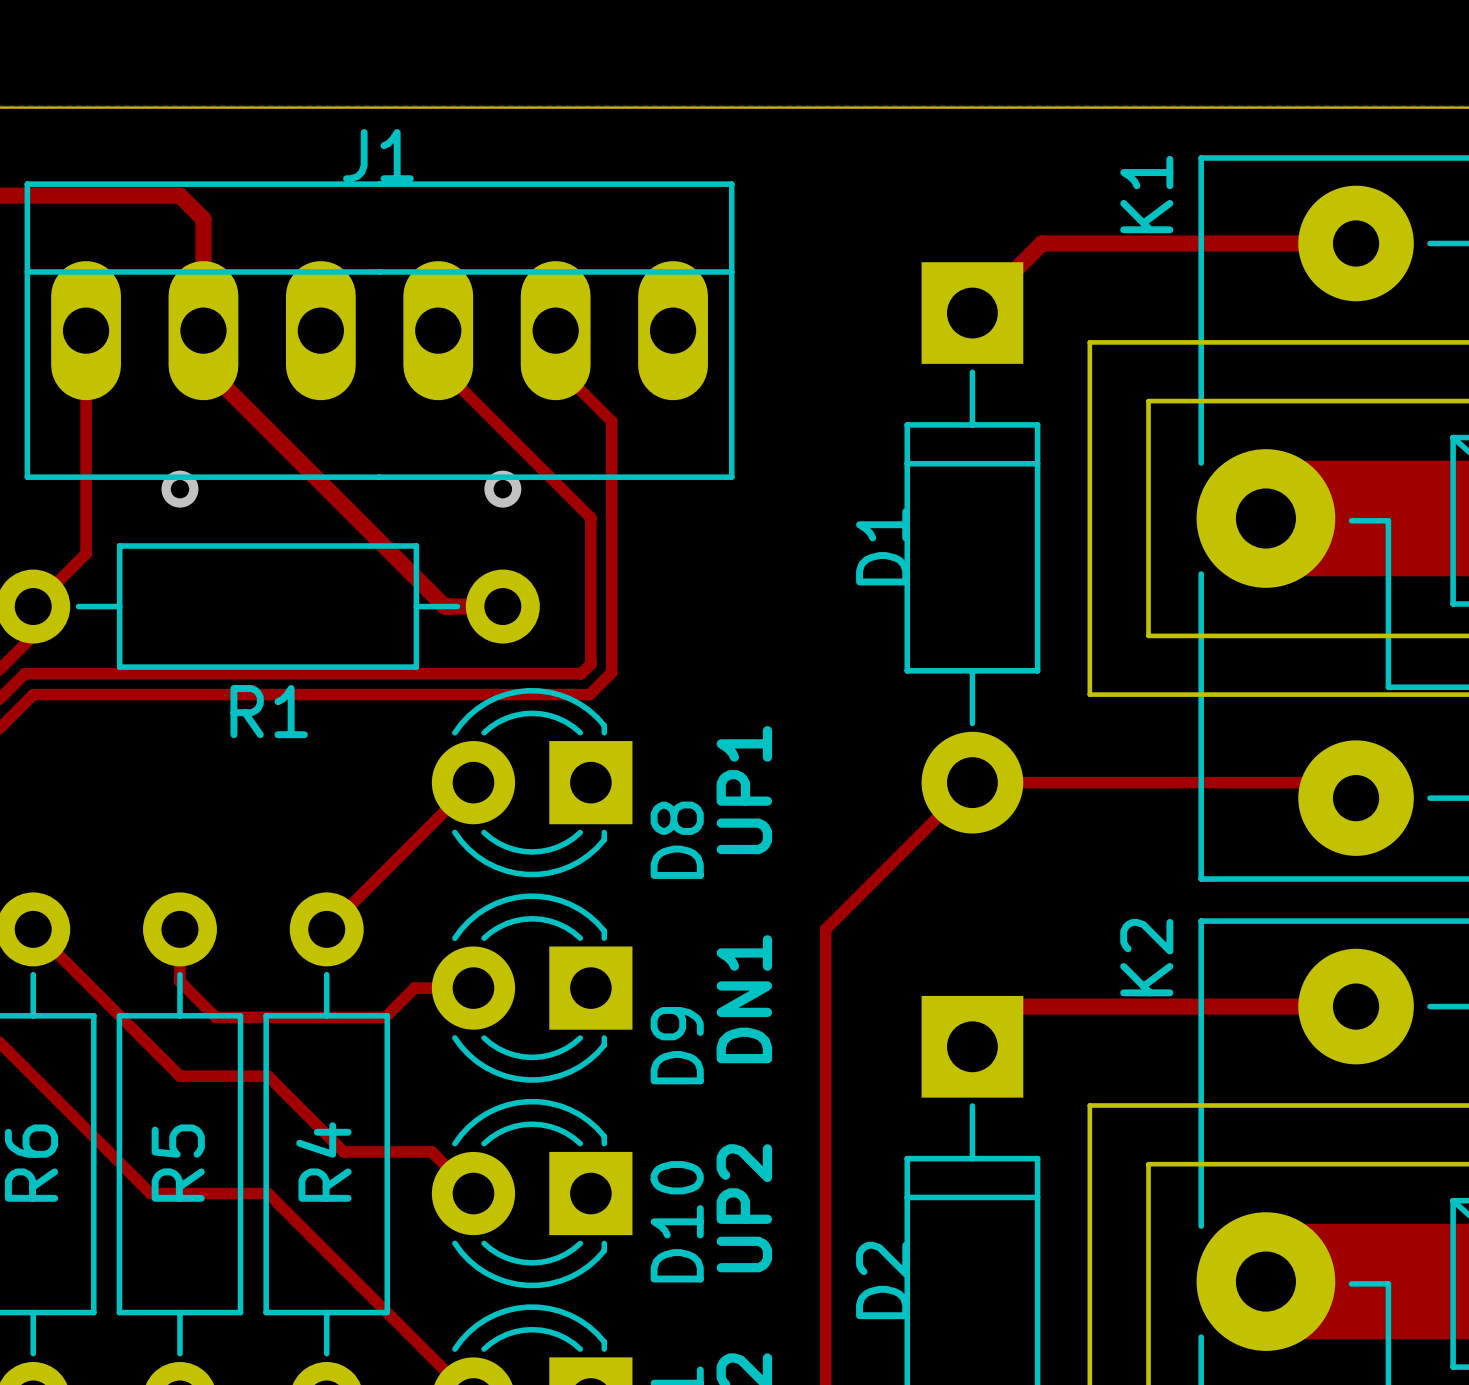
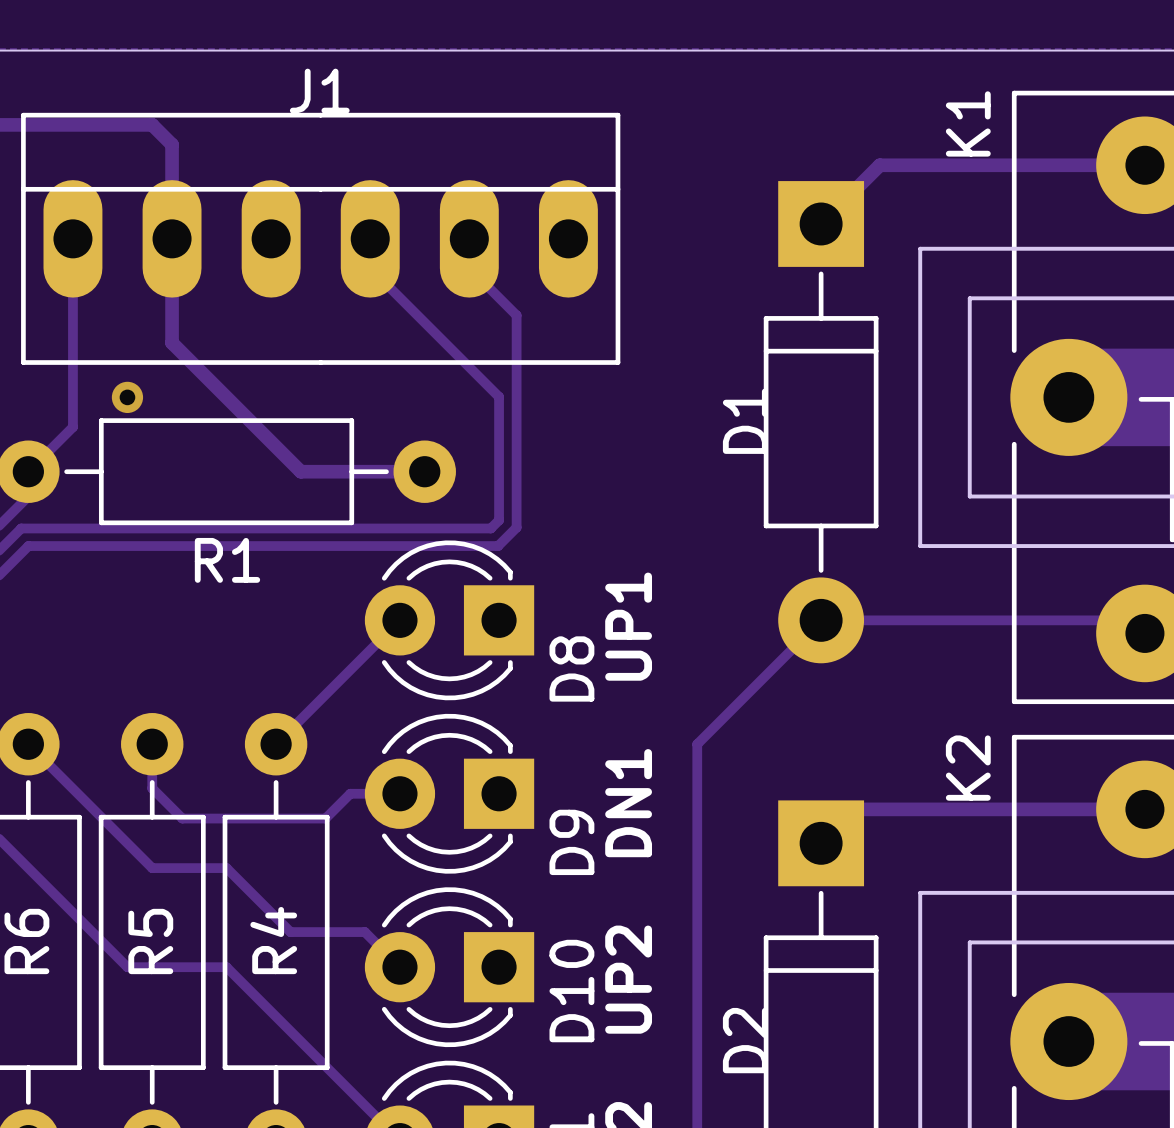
track: (203, 365) (444, 606) -> (172, 268) (172, 342) (300, 471) (375, 471)
via position: (179, 489) -> (127, 397)
via: (502, 489) -> none

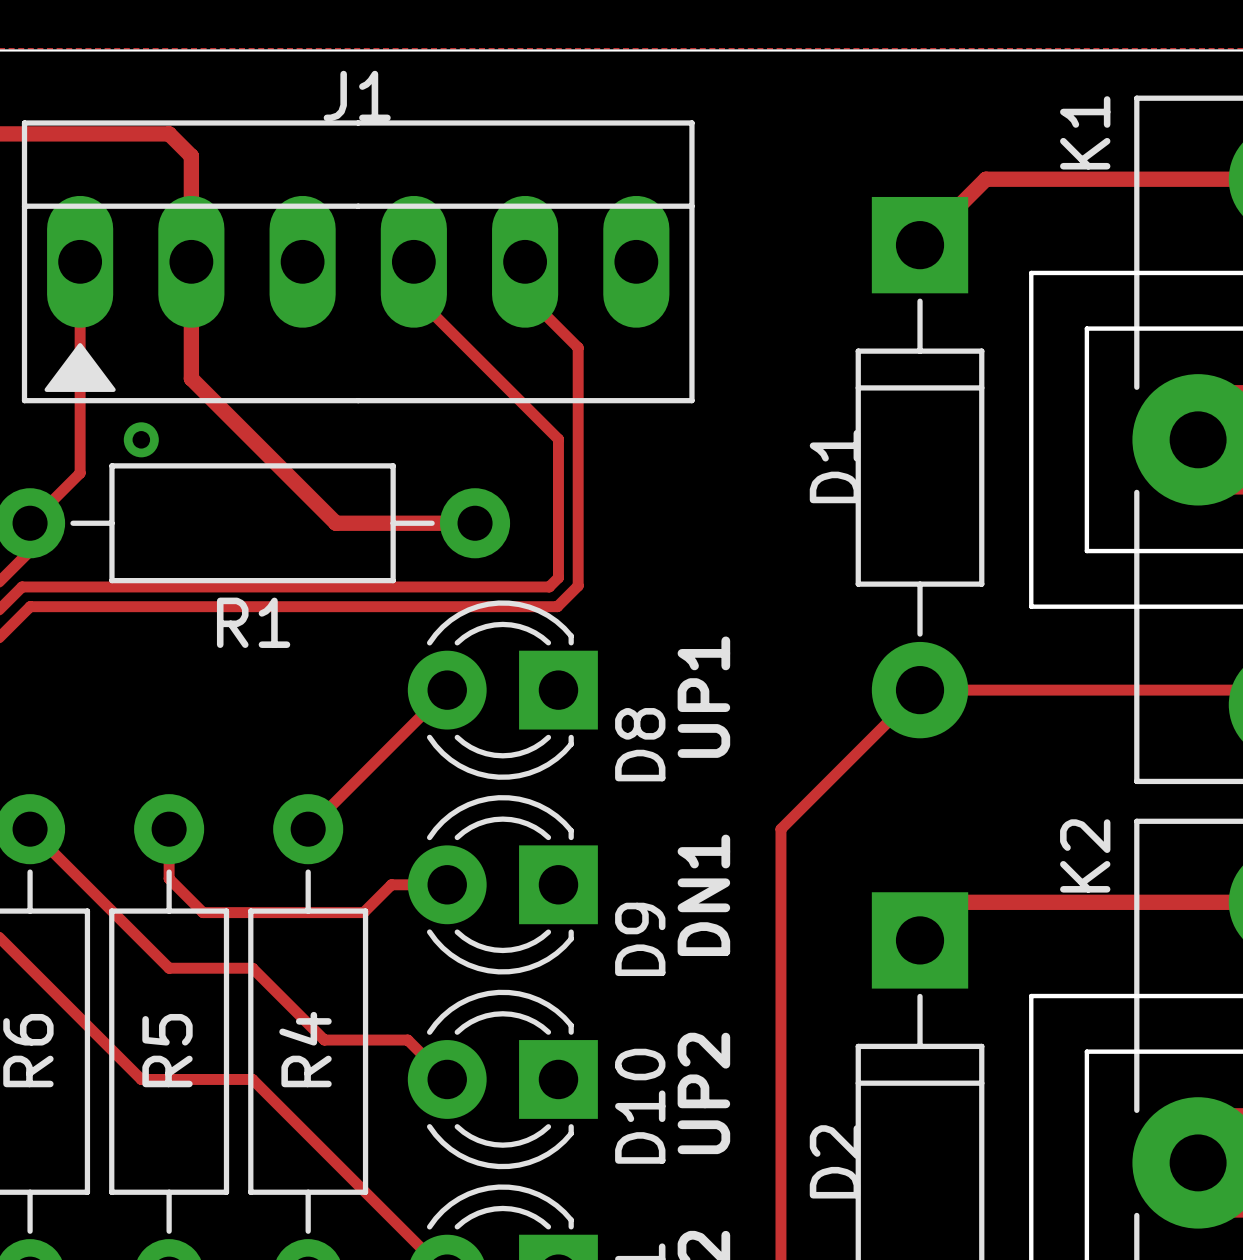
drawing: none -> [44, 343, 116, 392]

